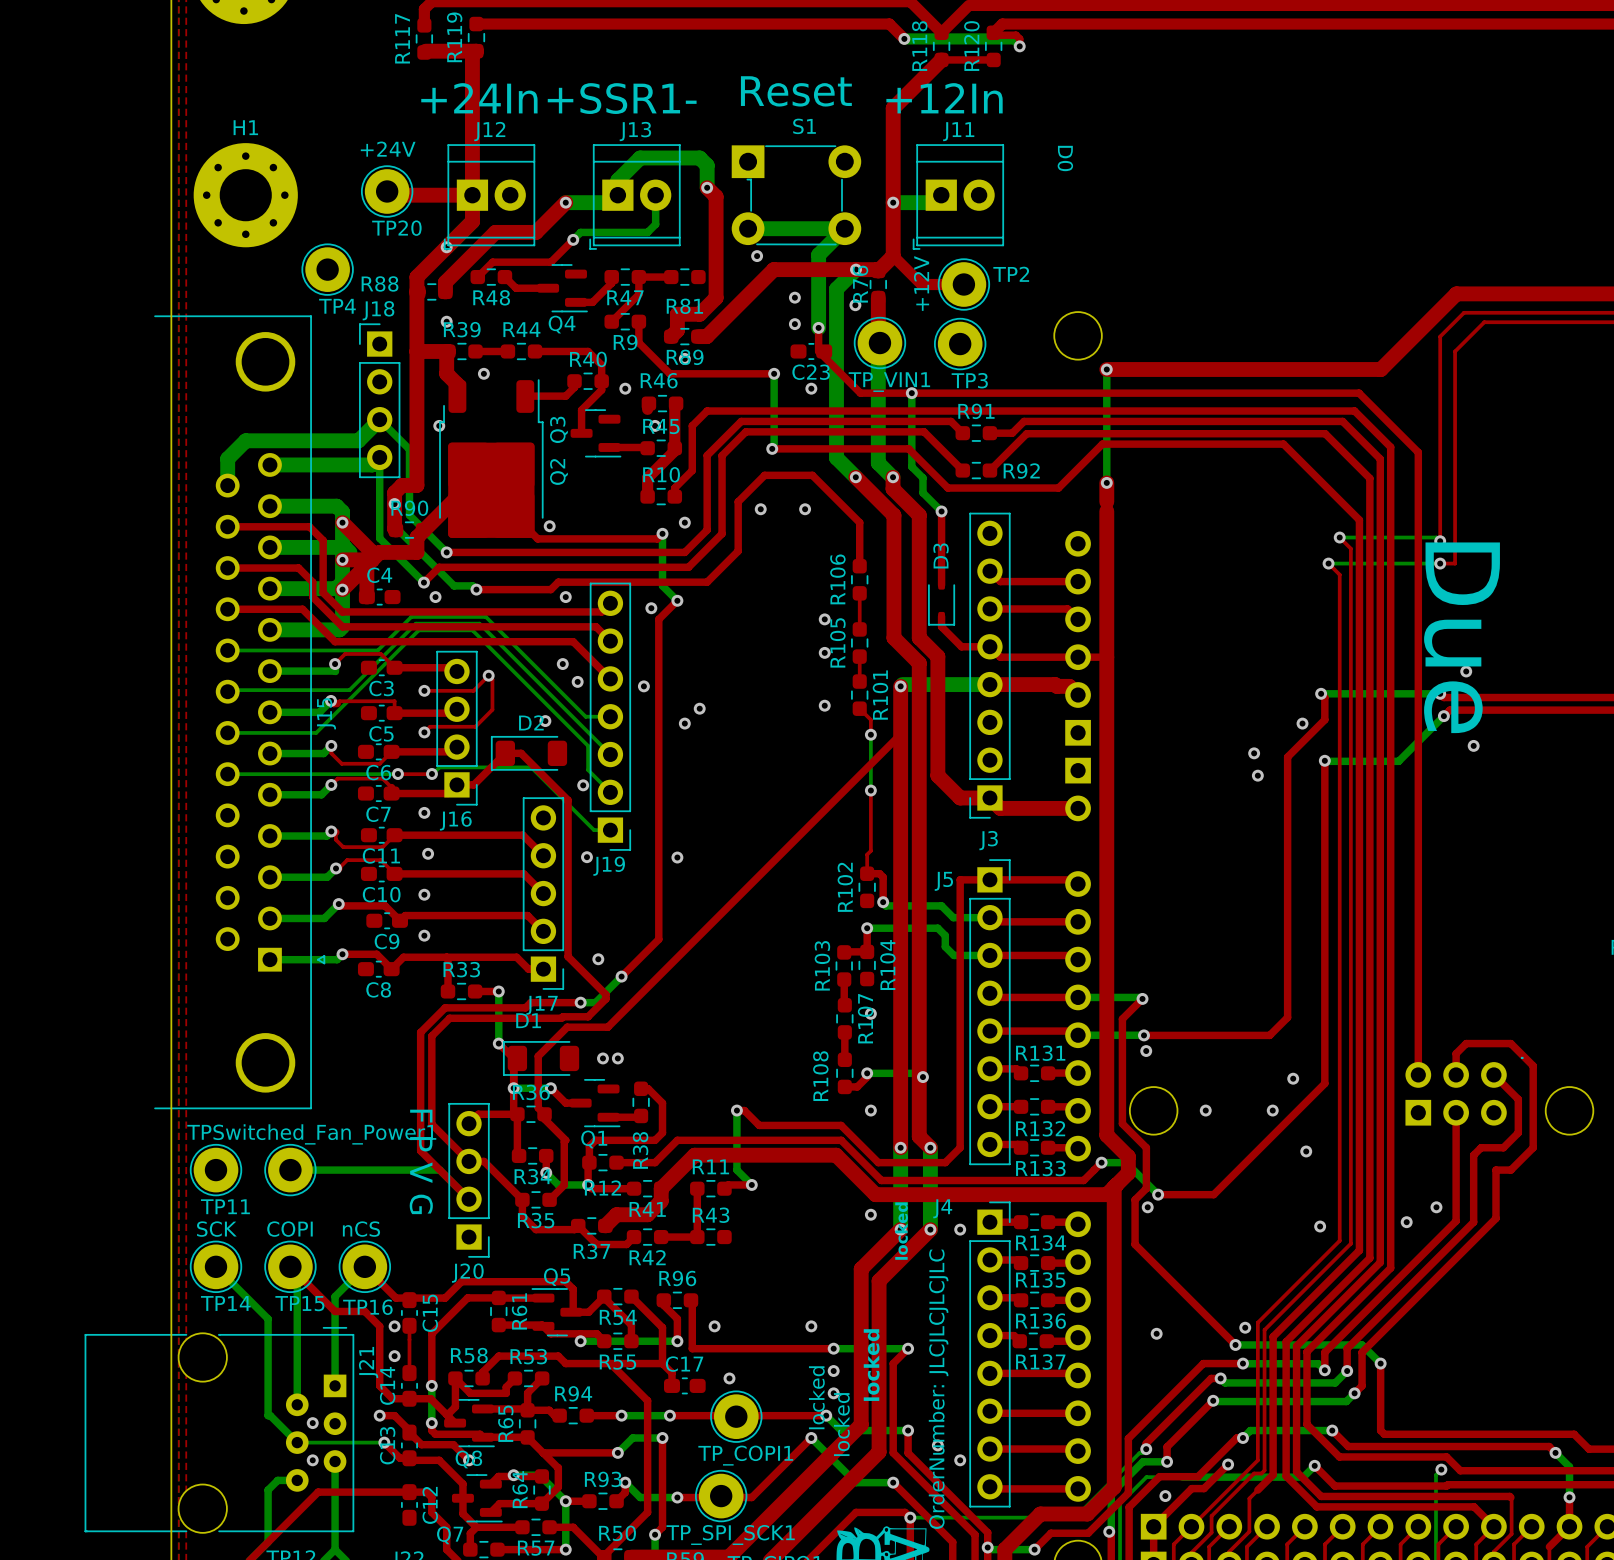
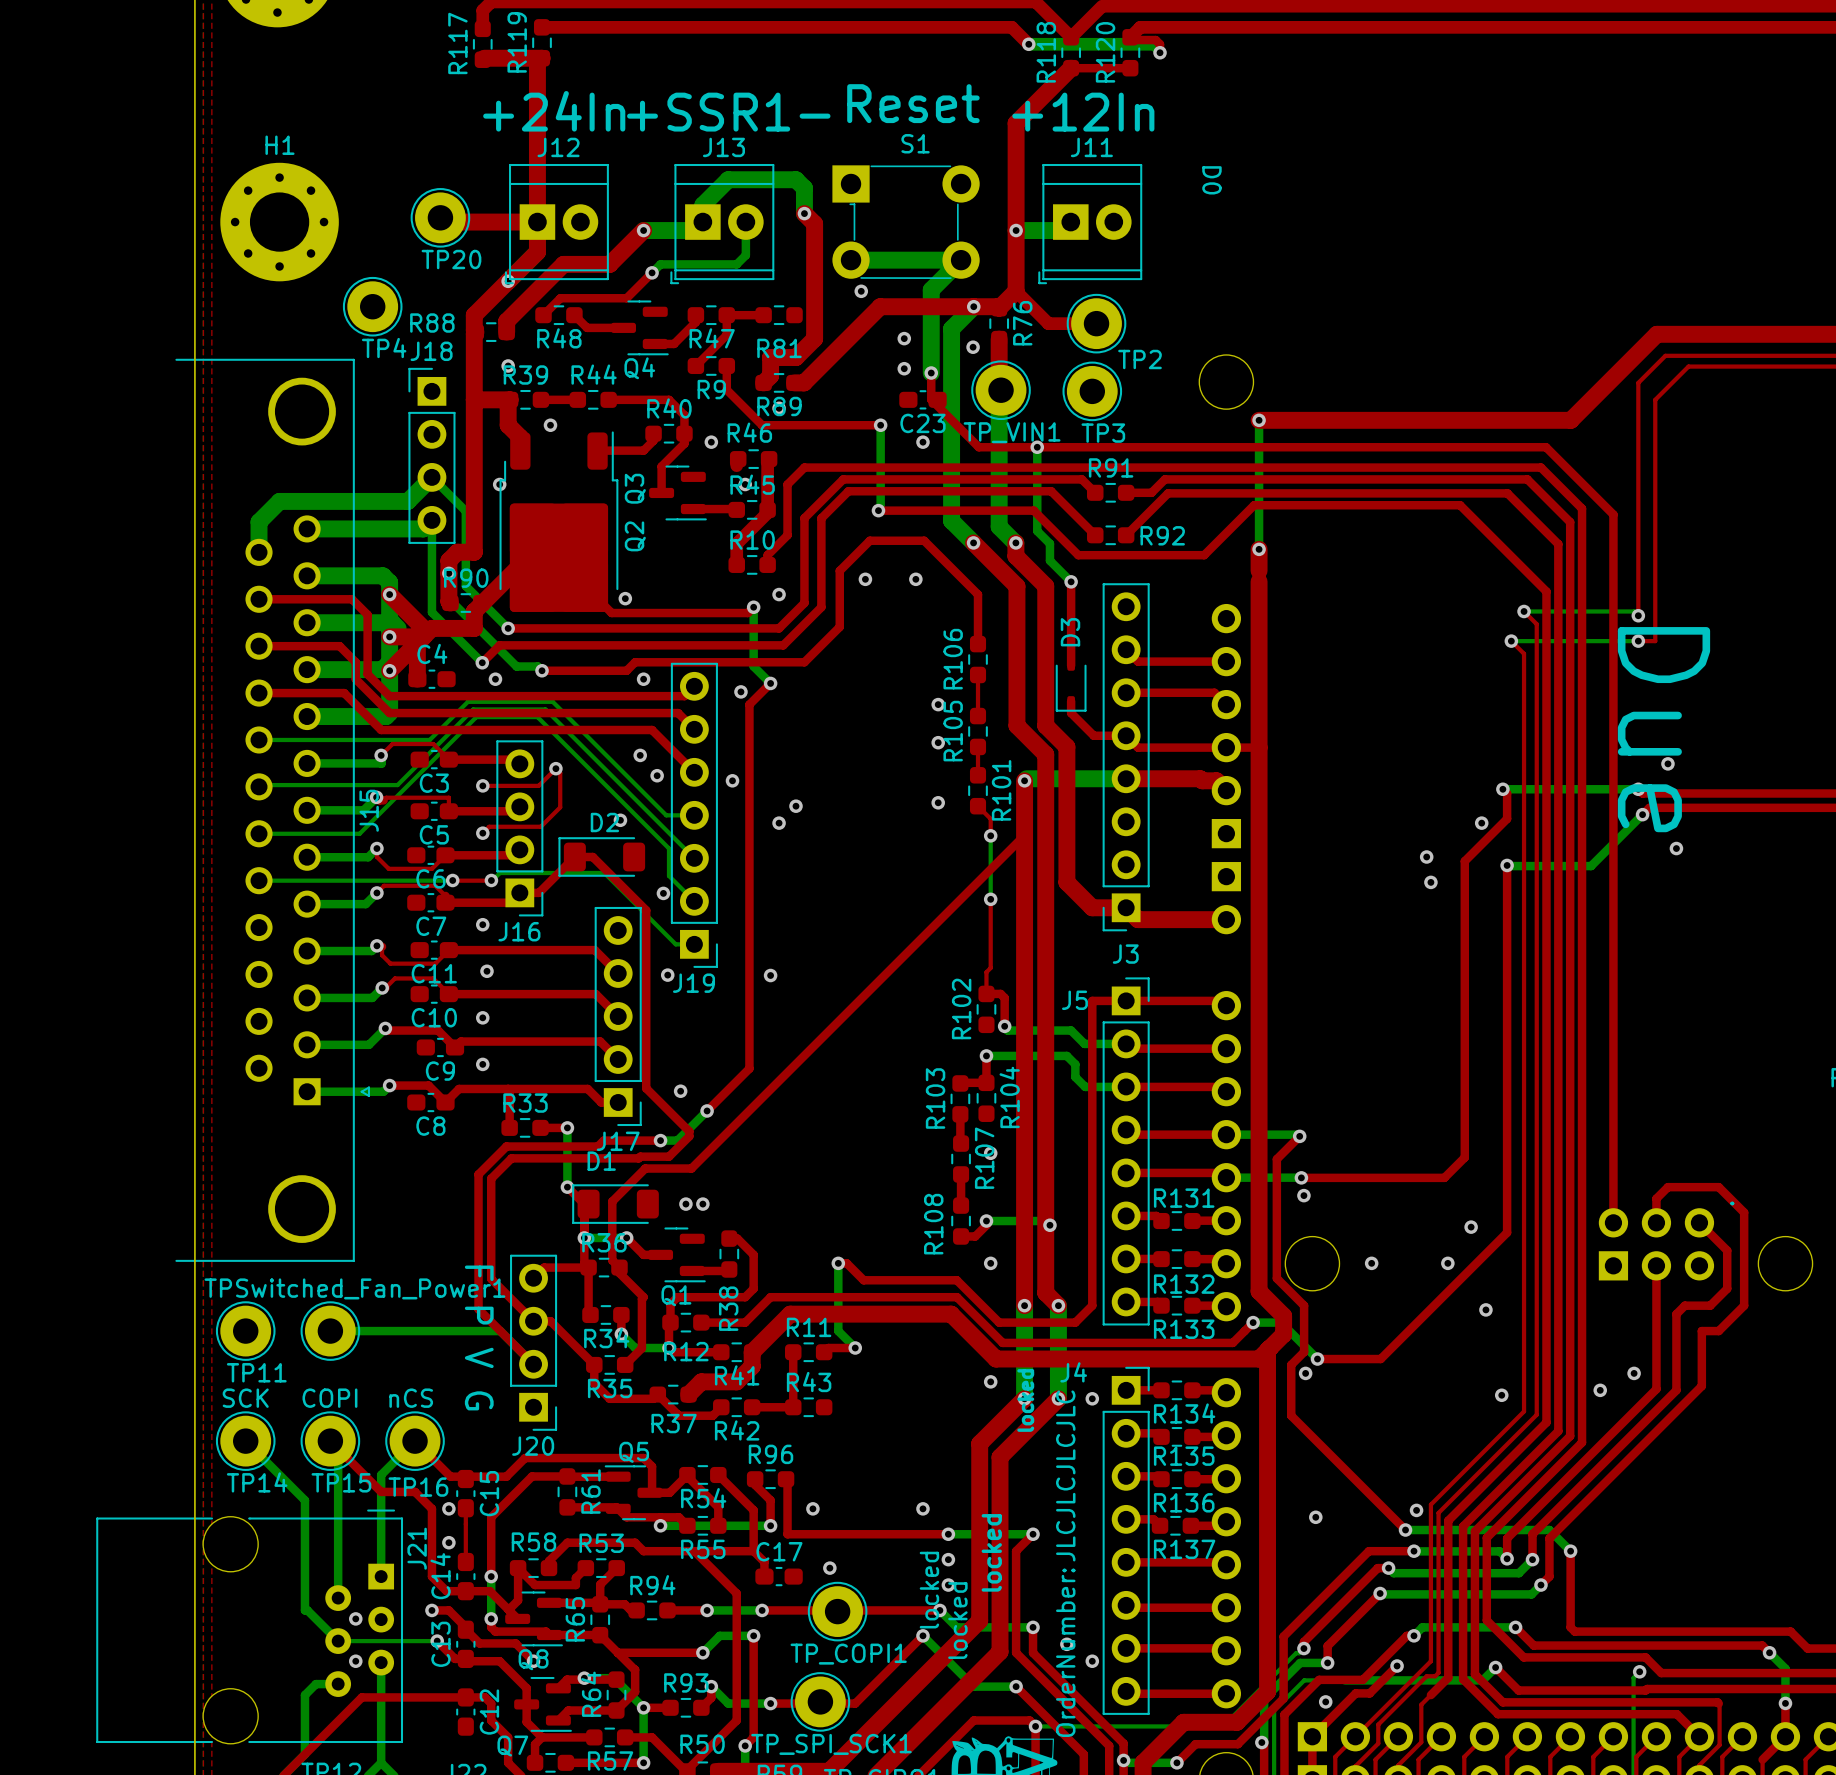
TP20 value: +24V (388, 149) -> none
TP2 name position: TP2 (1011, 274) -> TP2 (1139, 359)
TP2 value: +12V (921, 283) -> none
R76 name position: R76 (860, 284) -> R76 (1022, 323)

